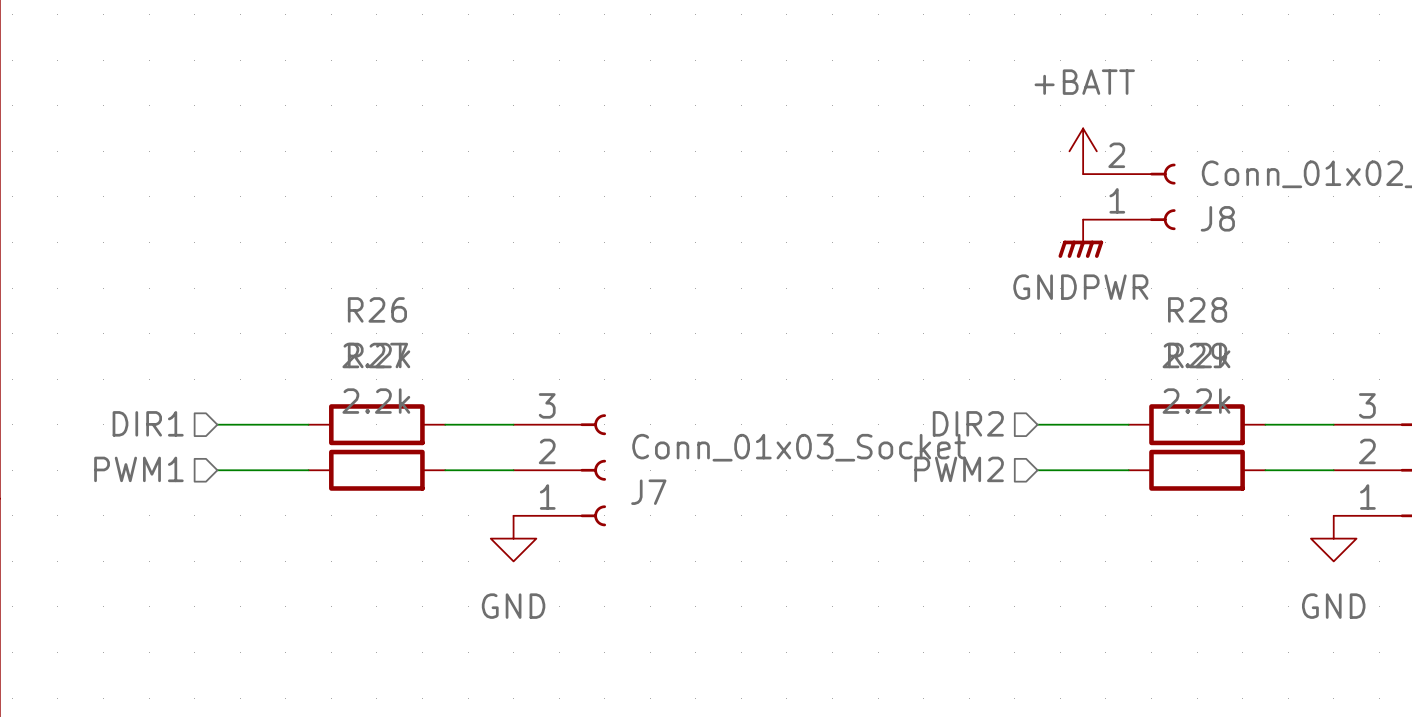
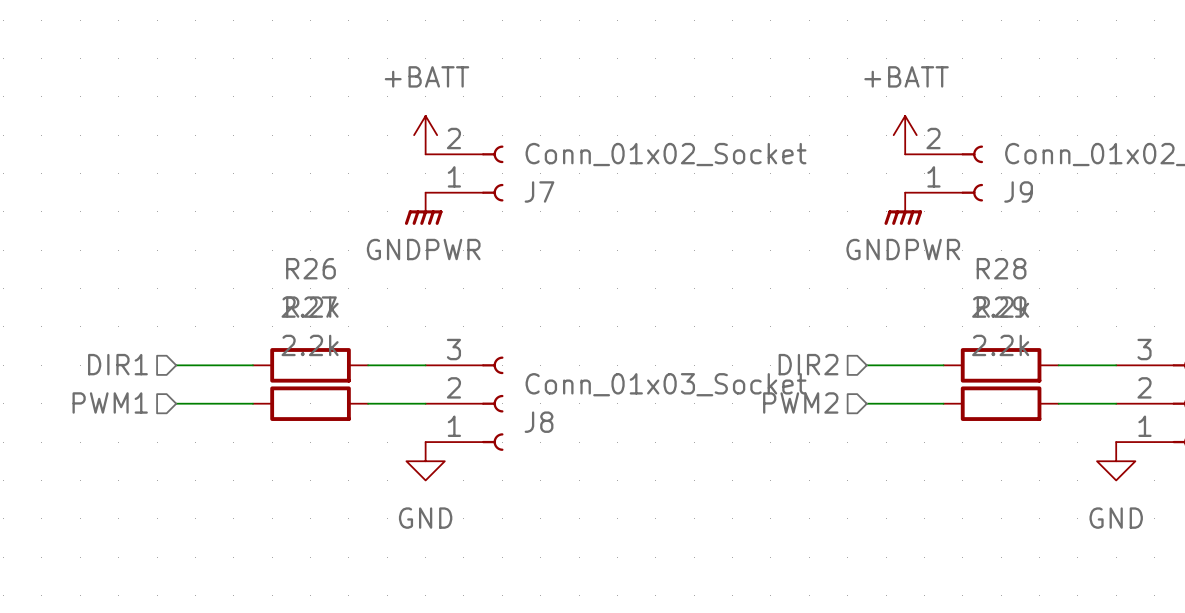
power symbol: none -> +BATT (425, 135)
J7: none -> Conn_01x02_Socket (464, 173)
J8 name: J8 (1217, 218) -> J9 (1018, 191)
power symbol: none -> GNDPWR (423, 208)
J7 name: J7 (648, 492) -> J8 (539, 422)

